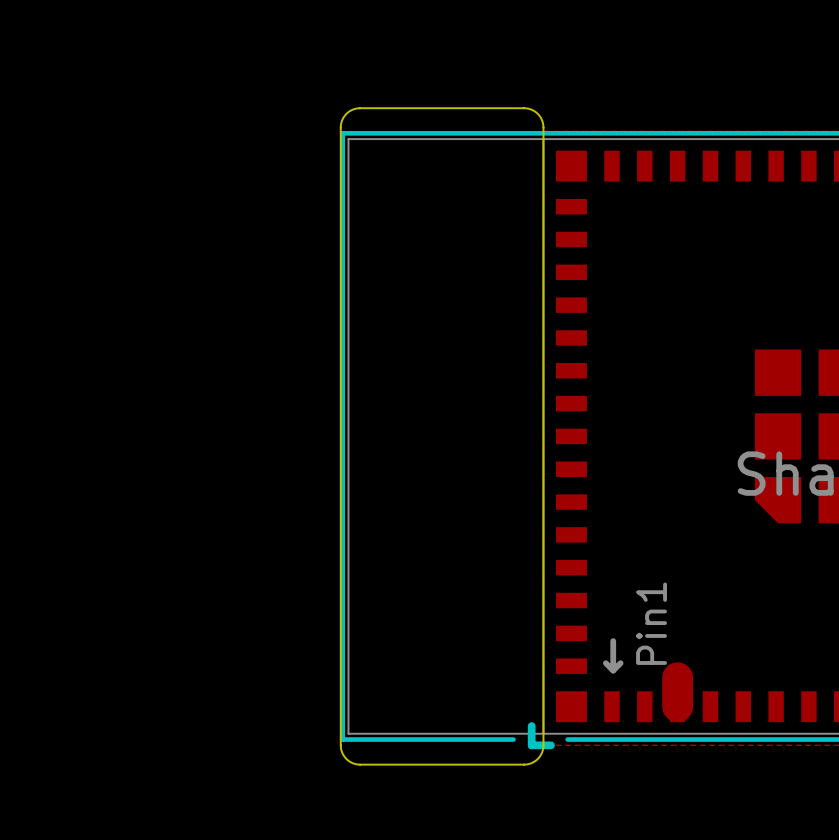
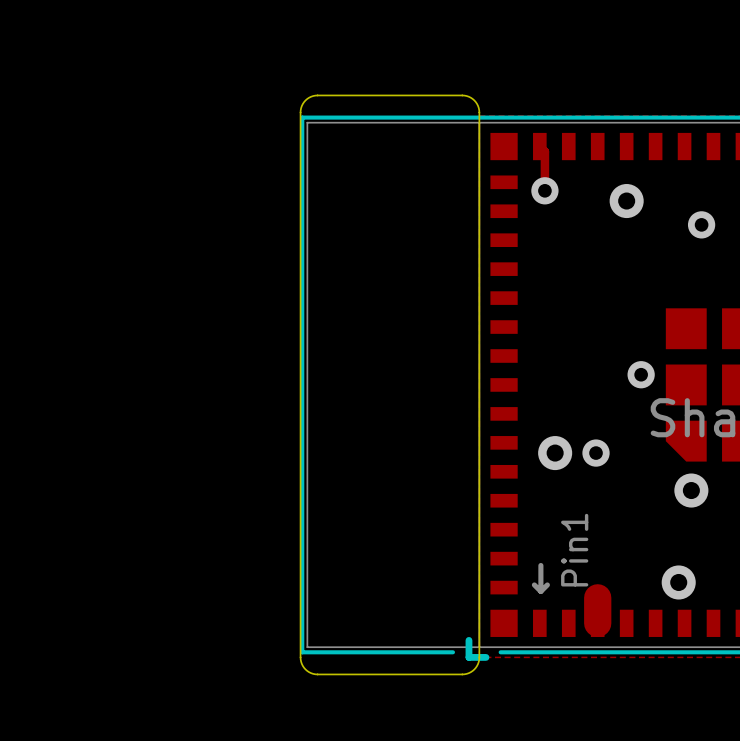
track: none -> (539, 146) (544, 151) (544, 190)
via: none -> (544, 190)
via: none -> (626, 201)
via: none -> (701, 224)
via: none -> (641, 374)
via: none -> (555, 453)
via: none -> (596, 453)
via: none -> (691, 490)
via: none -> (678, 582)

